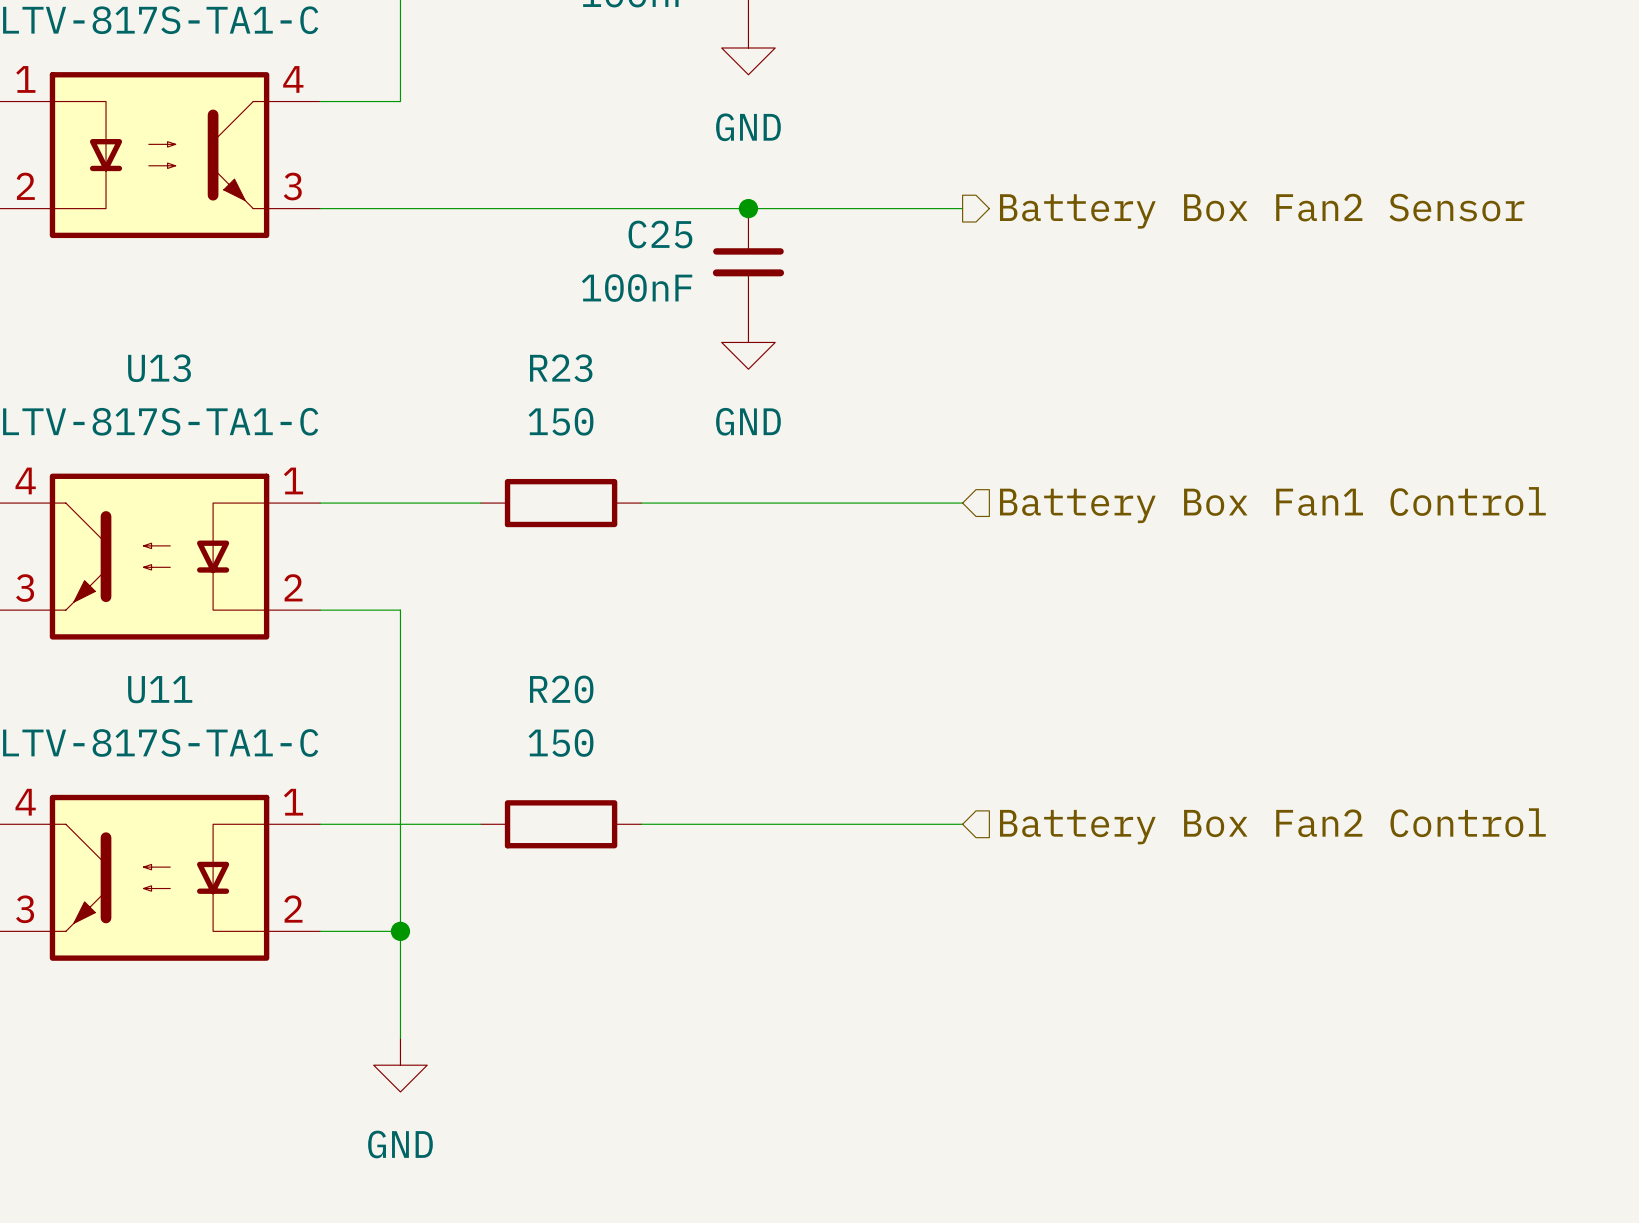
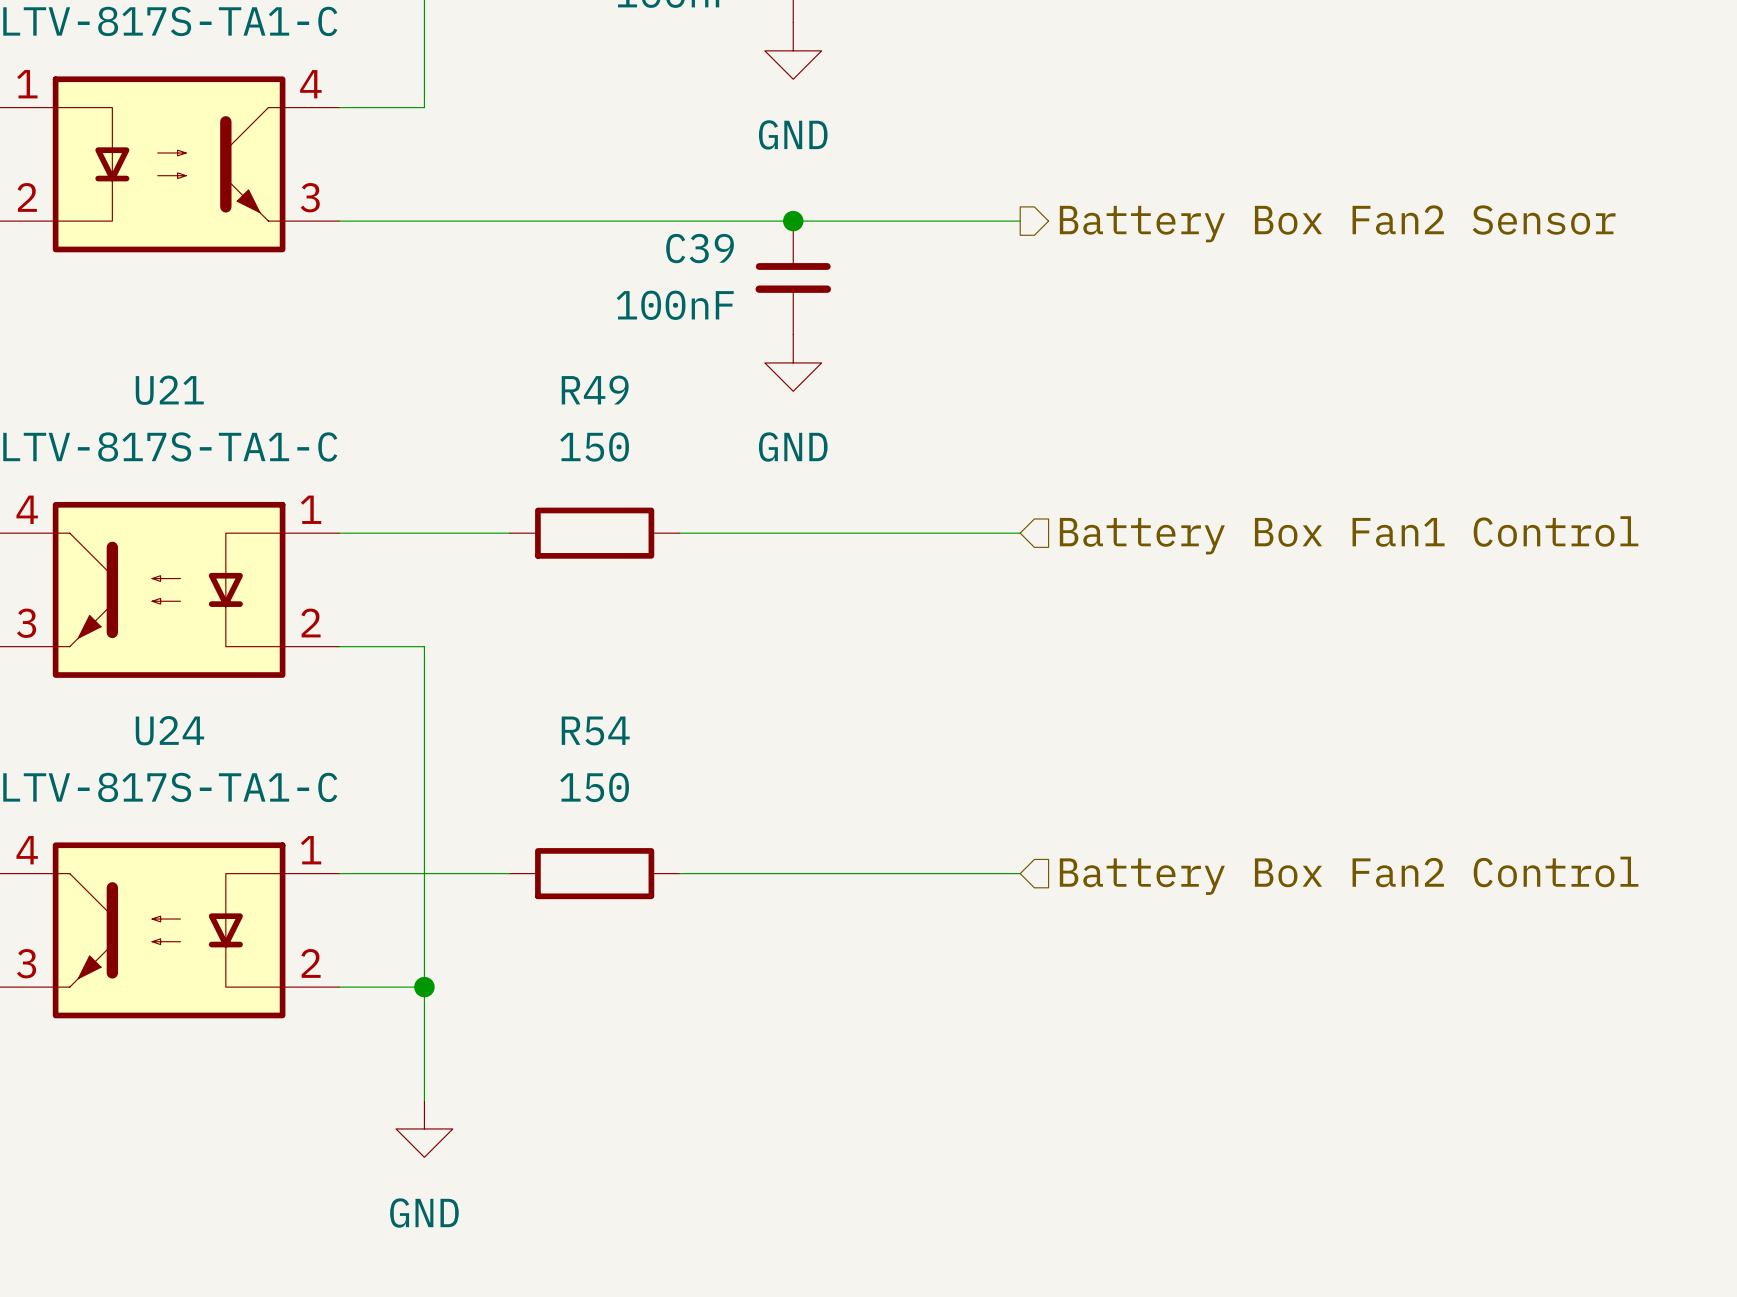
C25 name: C25 (660, 234) -> C39 (700, 248)
U13 name: U13 (159, 368) -> U21 (169, 390)
R23 name: R23 (561, 368) -> R49 (595, 390)
U11 name: U11 (160, 689) -> U24 (169, 730)
R20 name: R20 (561, 689) -> R54 (595, 730)

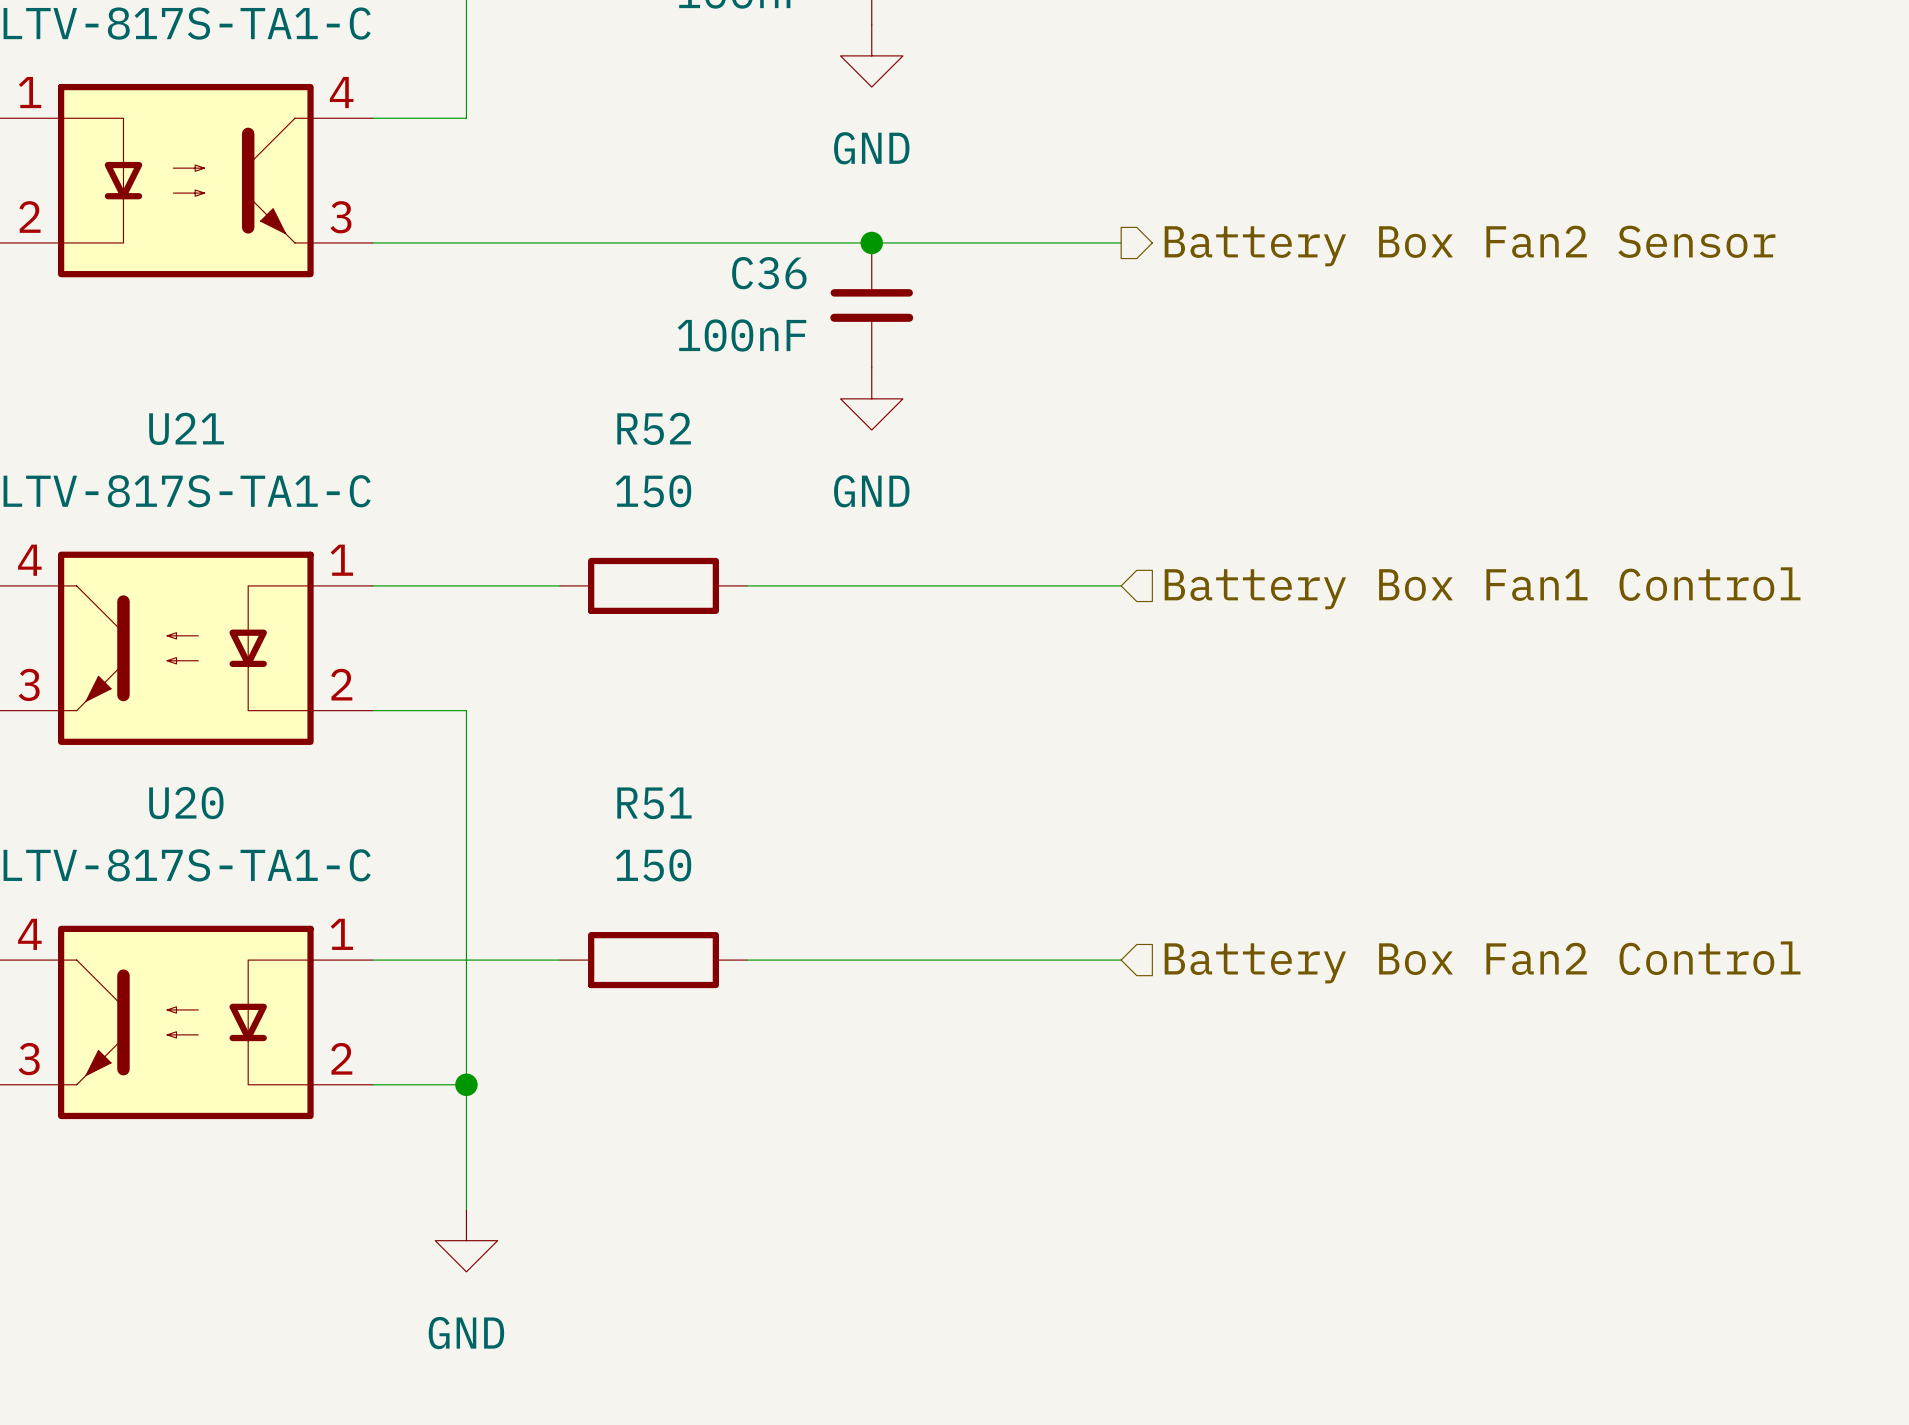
C39 name: C39 (700, 248) -> C36 (769, 273)
R49 name: R49 (595, 390) -> R52 (654, 428)
U24 name: U24 (169, 730) -> U20 (186, 803)
R54 name: R54 (595, 730) -> R51 (654, 803)

